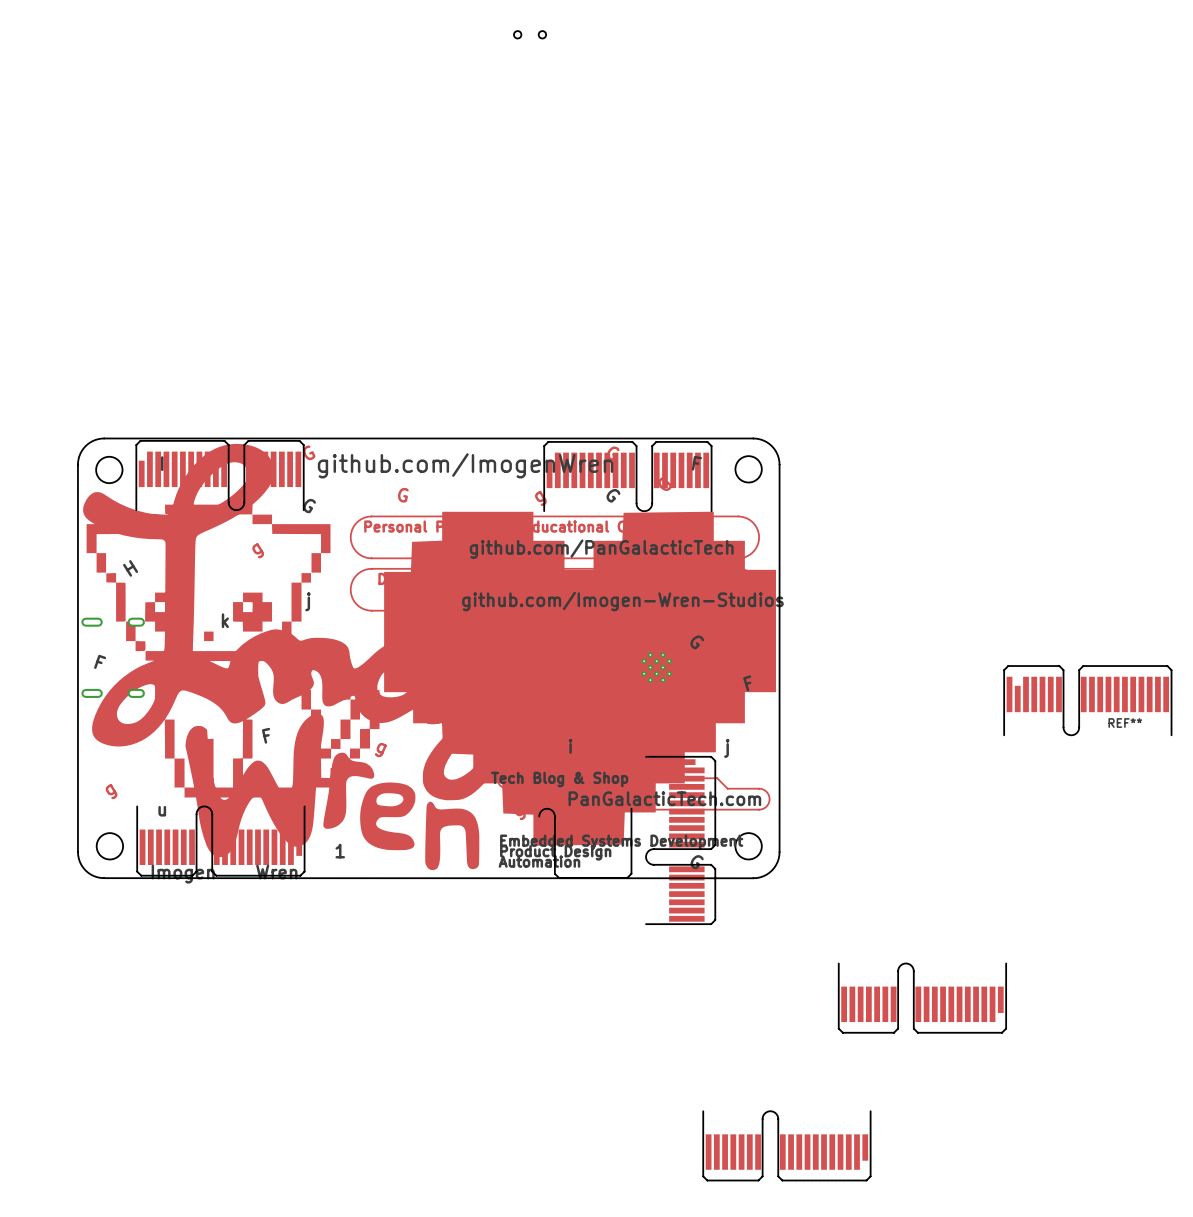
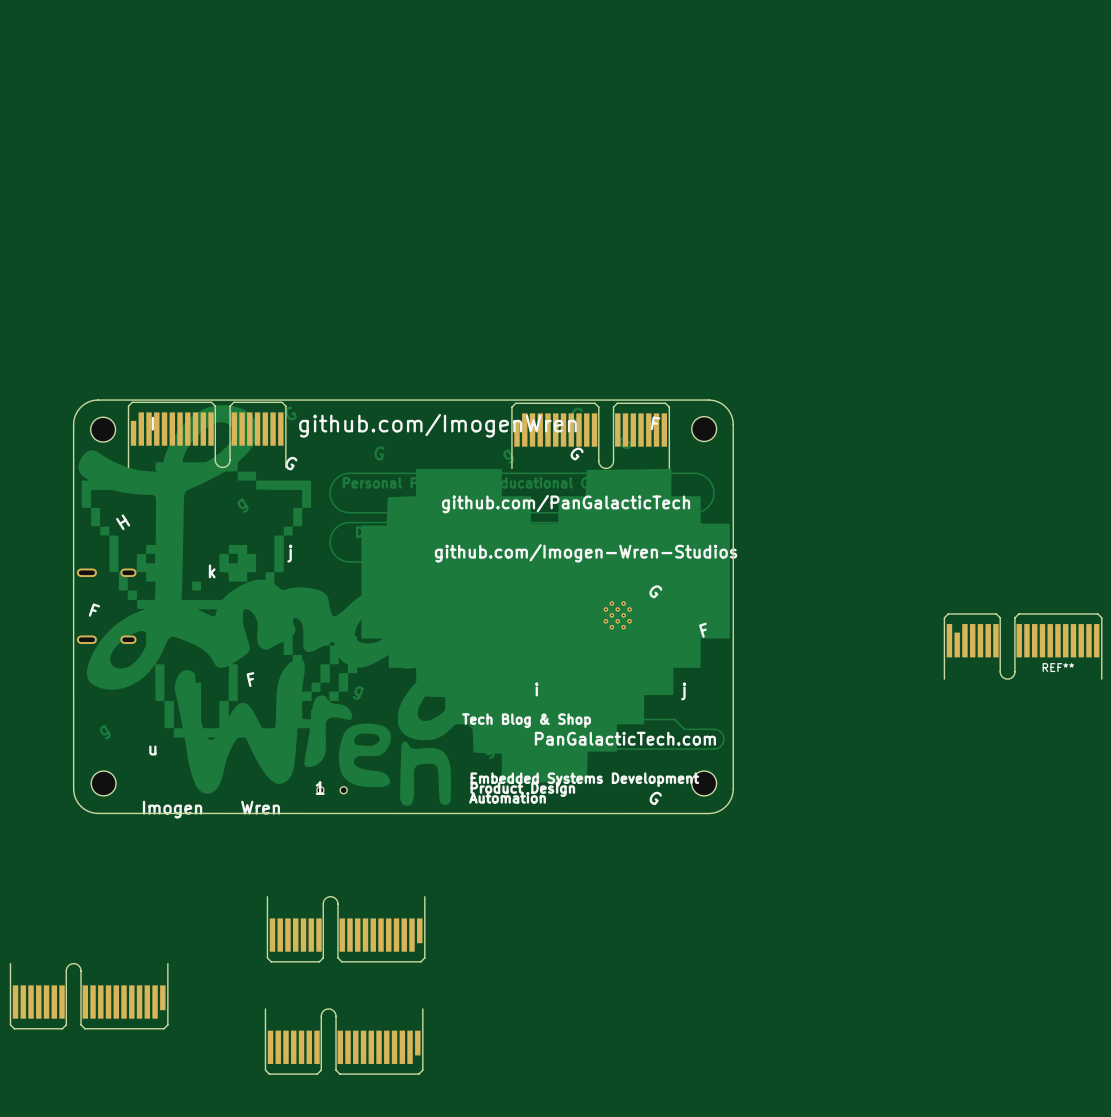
part: (530, 34) -> none
part: (680, 840) -> none
part: (220, 841) -> none
part: (585, 843) -> none
part: none -> (332, 790)
part: (922, 998) -> none
part: none -> (346, 929)
part: none -> (89, 996)
part: none -> (344, 1041)
part: (786, 1145) -> none

